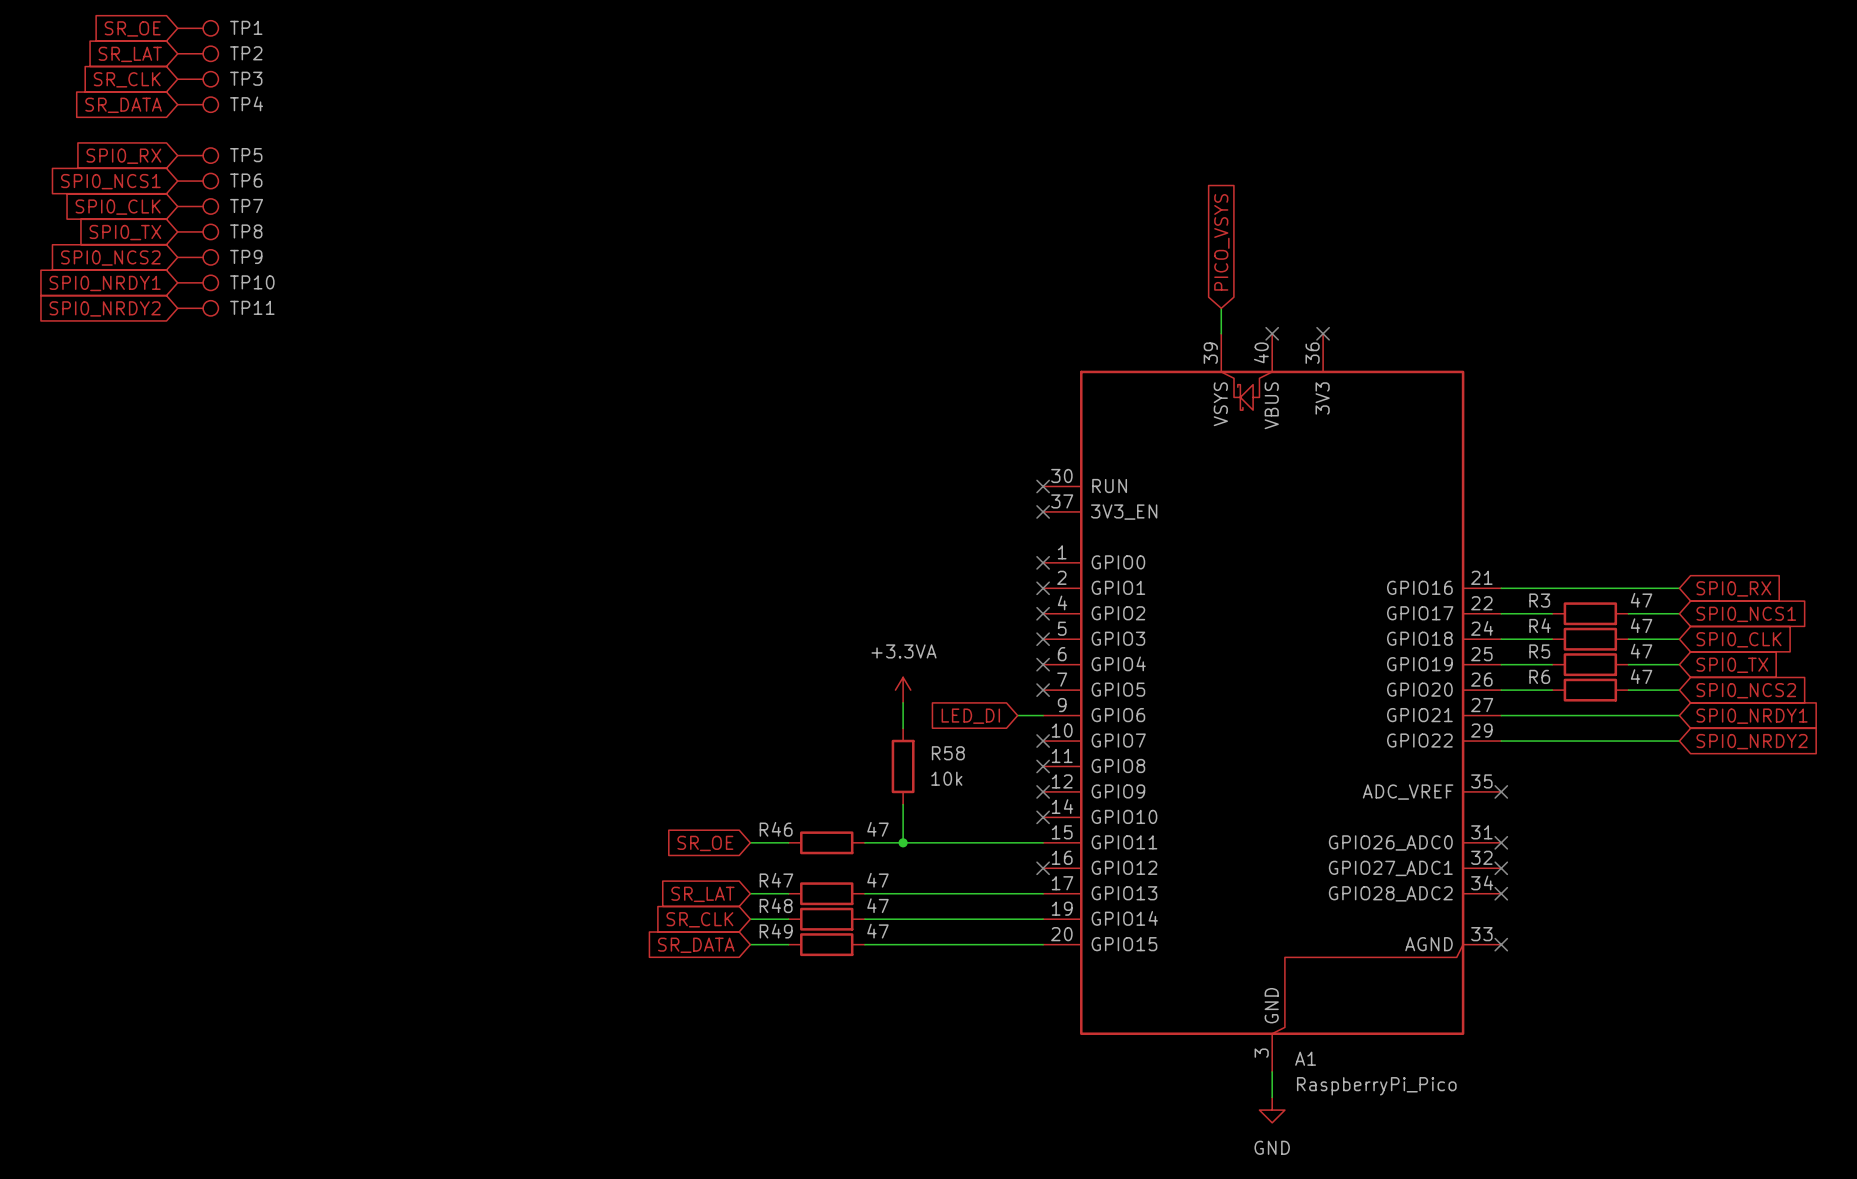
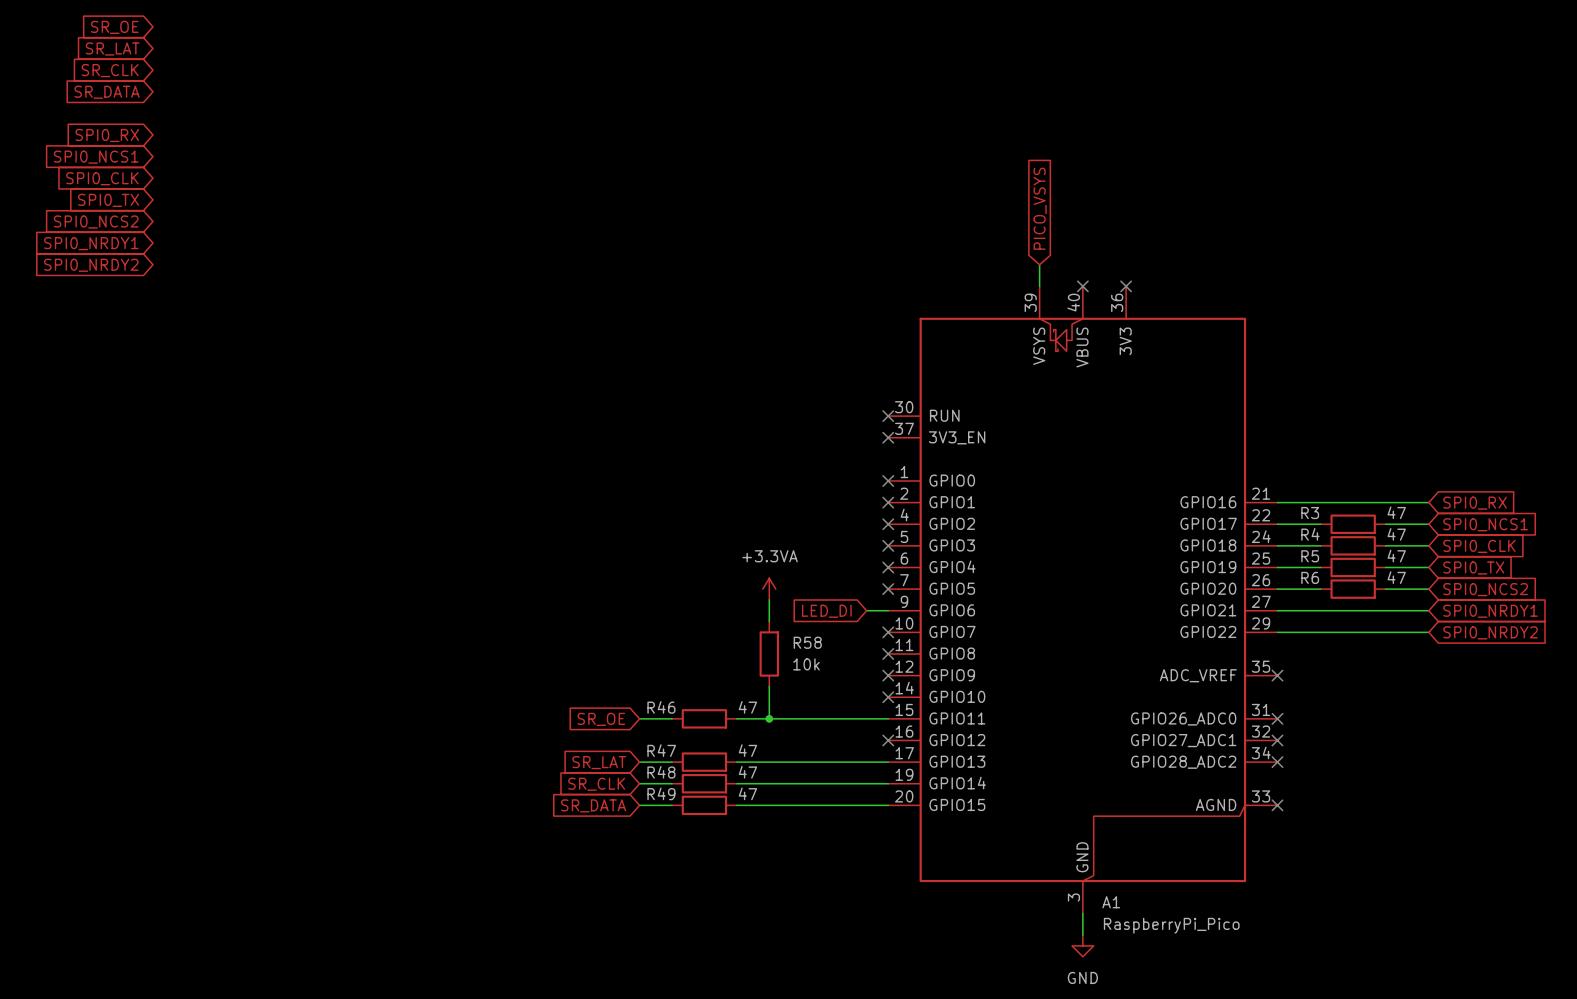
TP1: (198, 28) -> none
TP2: (198, 53) -> none
TP3: (198, 79) -> none
TP4: (198, 104) -> none
TP5: (198, 155) -> none
TP6: (198, 181) -> none
TP7: (198, 206) -> none
TP8: (198, 231) -> none
TP9: (198, 257) -> none
TP10: (198, 282) -> none
TP11: (198, 308) -> none

